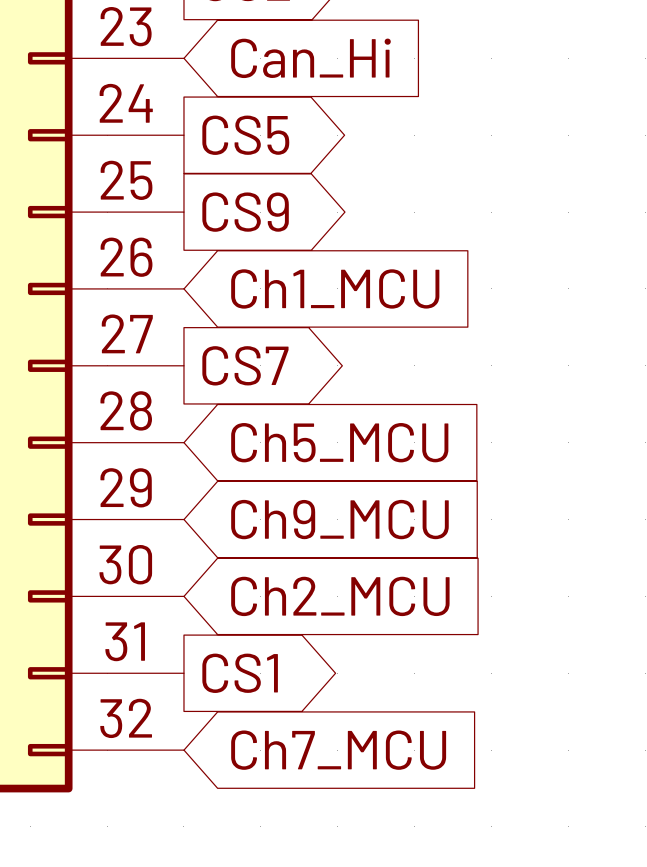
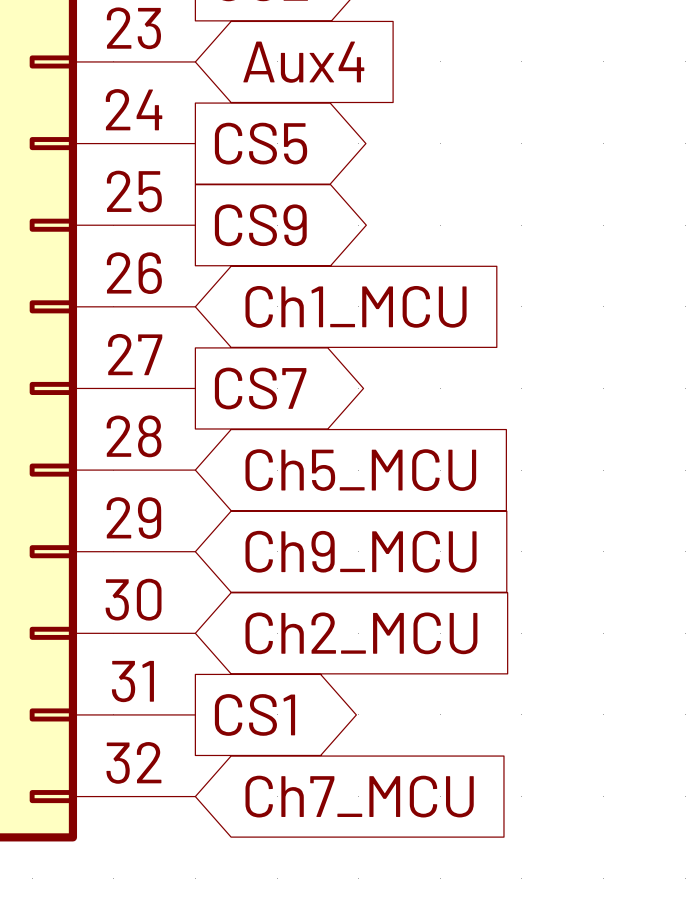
global label: Can_Hi (310, 58) -> Aux4 (303, 62)

